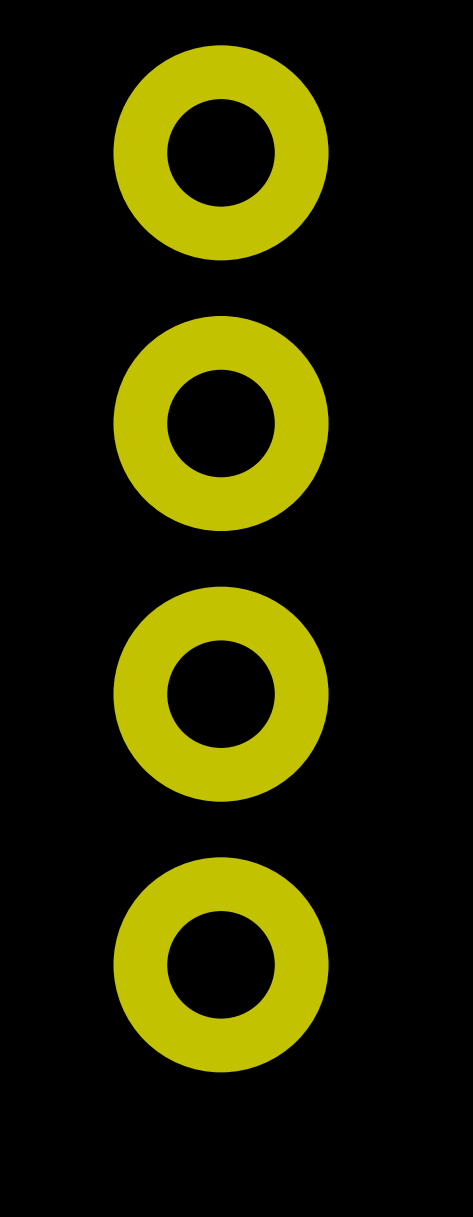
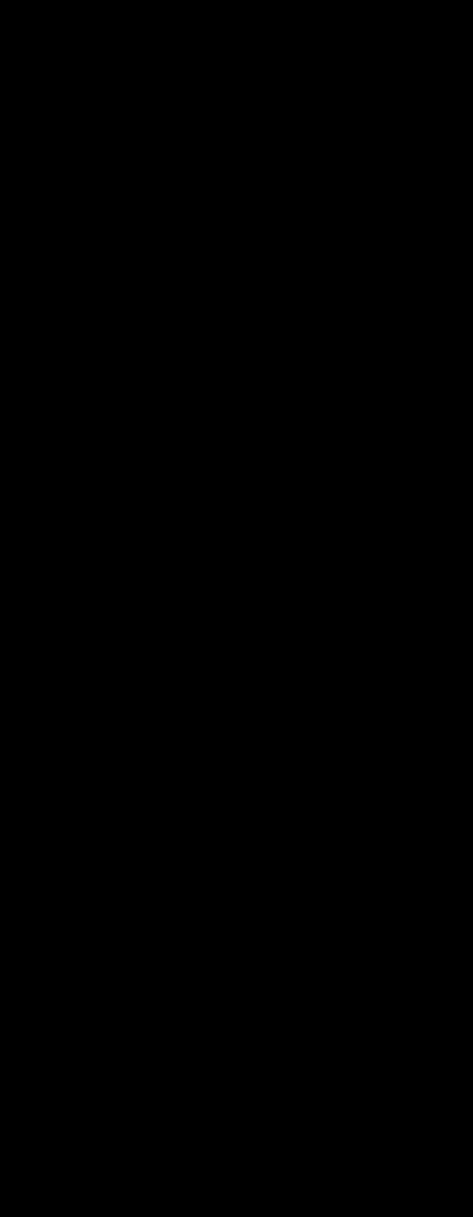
part: (221, 152) -> none
part: (221, 423) -> none
part: (221, 694) -> none
part: (221, 964) -> none

